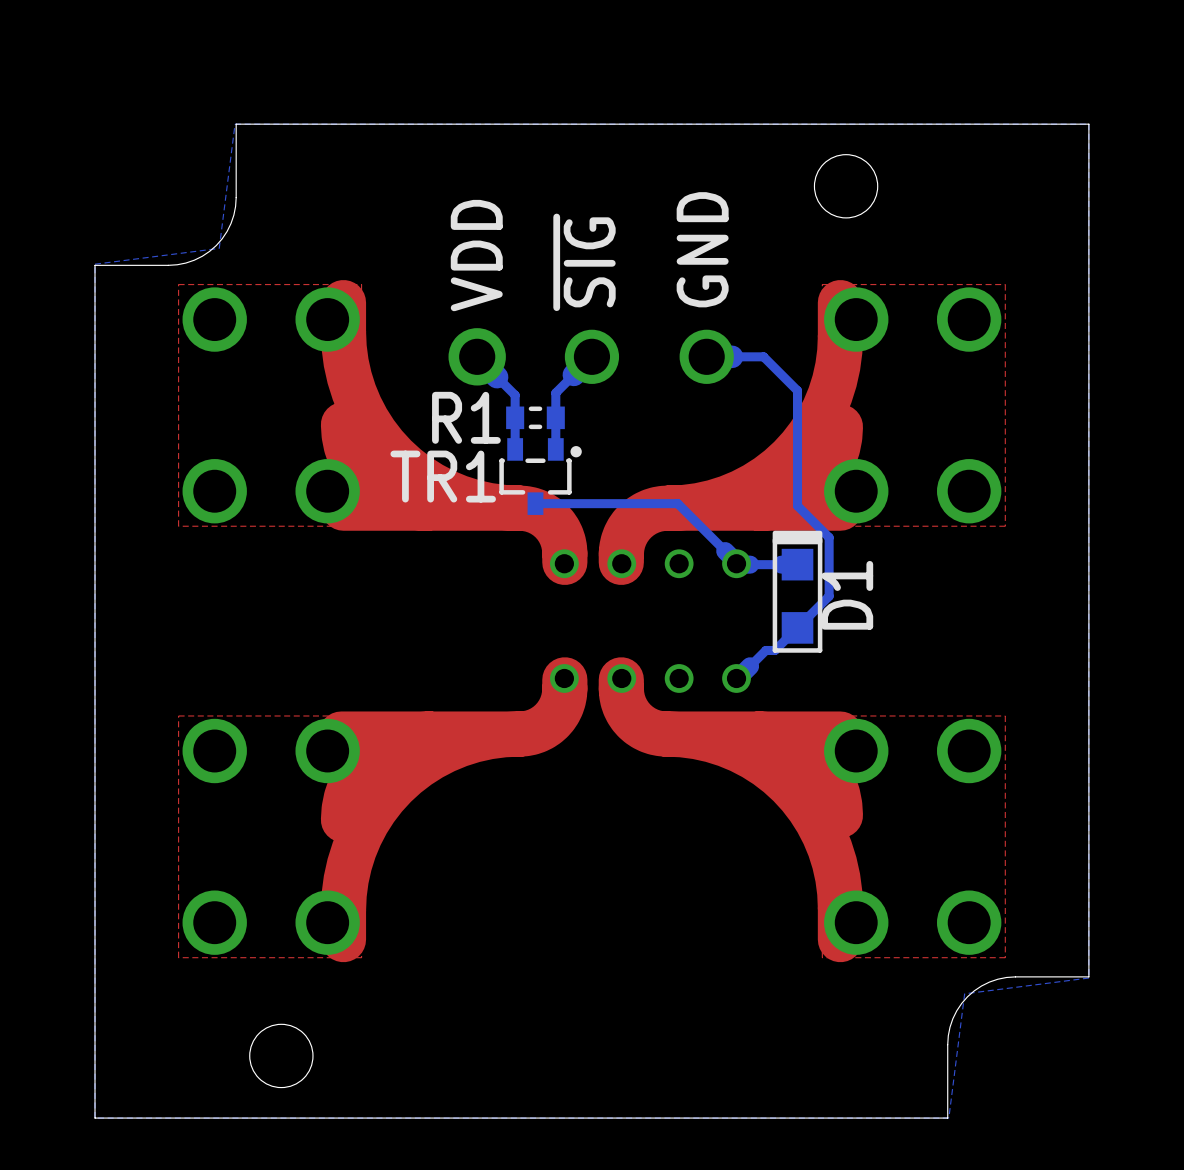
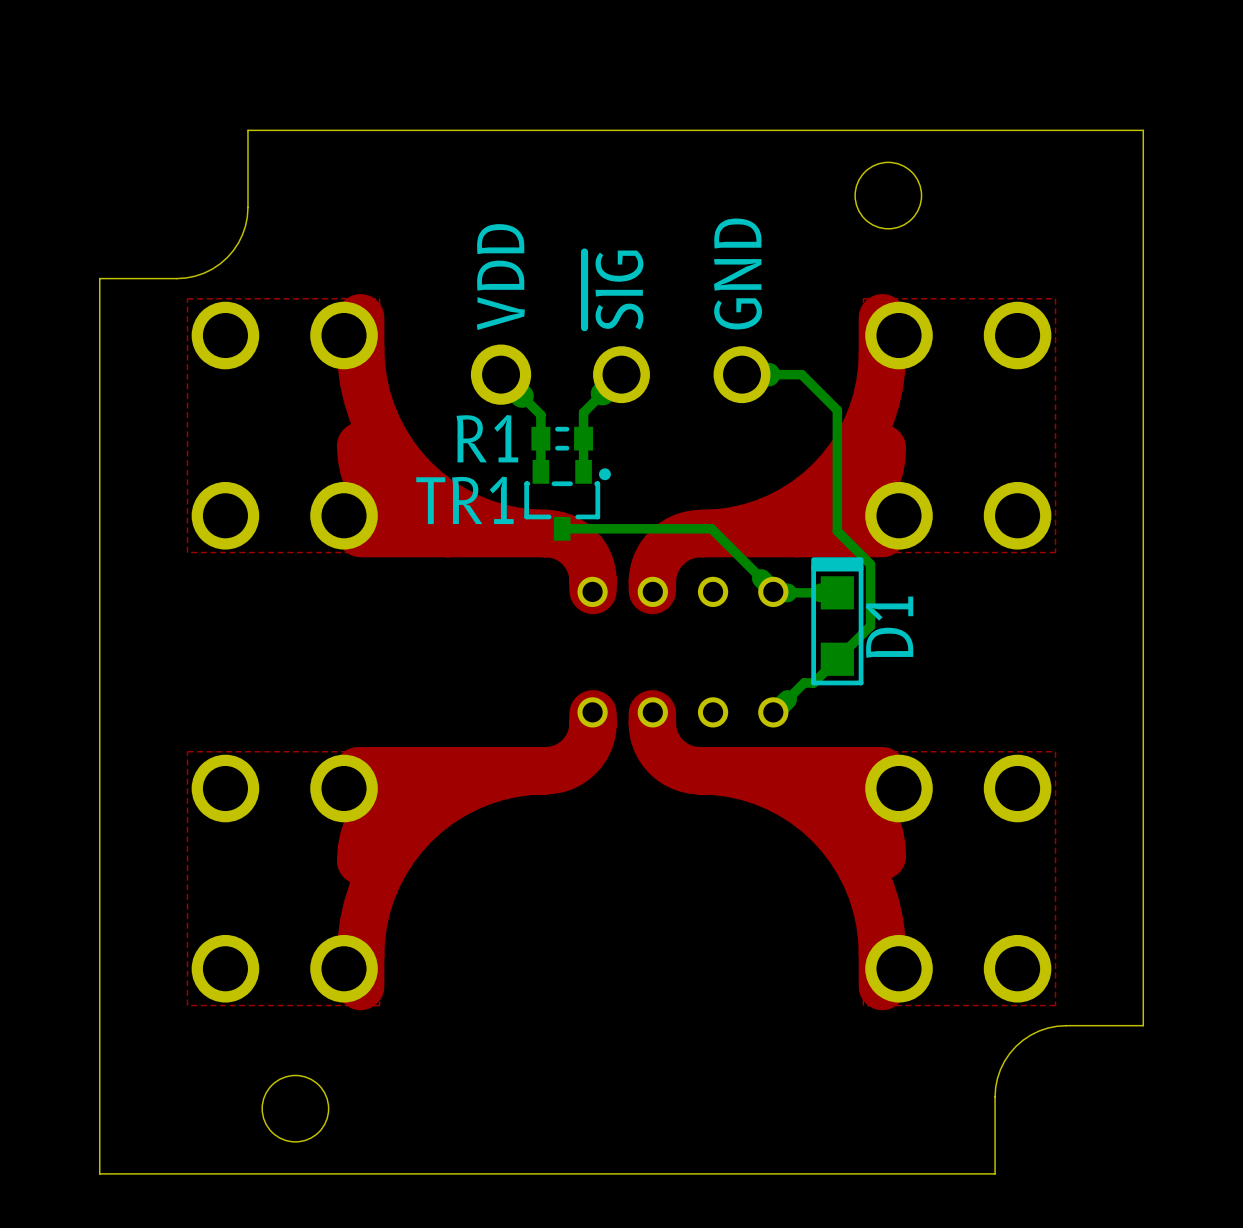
bottom zone outline: (1088, 124) (1088, 978) (964, 993) (948, 1118) (95, 1118) (95, 264) (219, 248) (235, 124) (1088, 124) -> none

